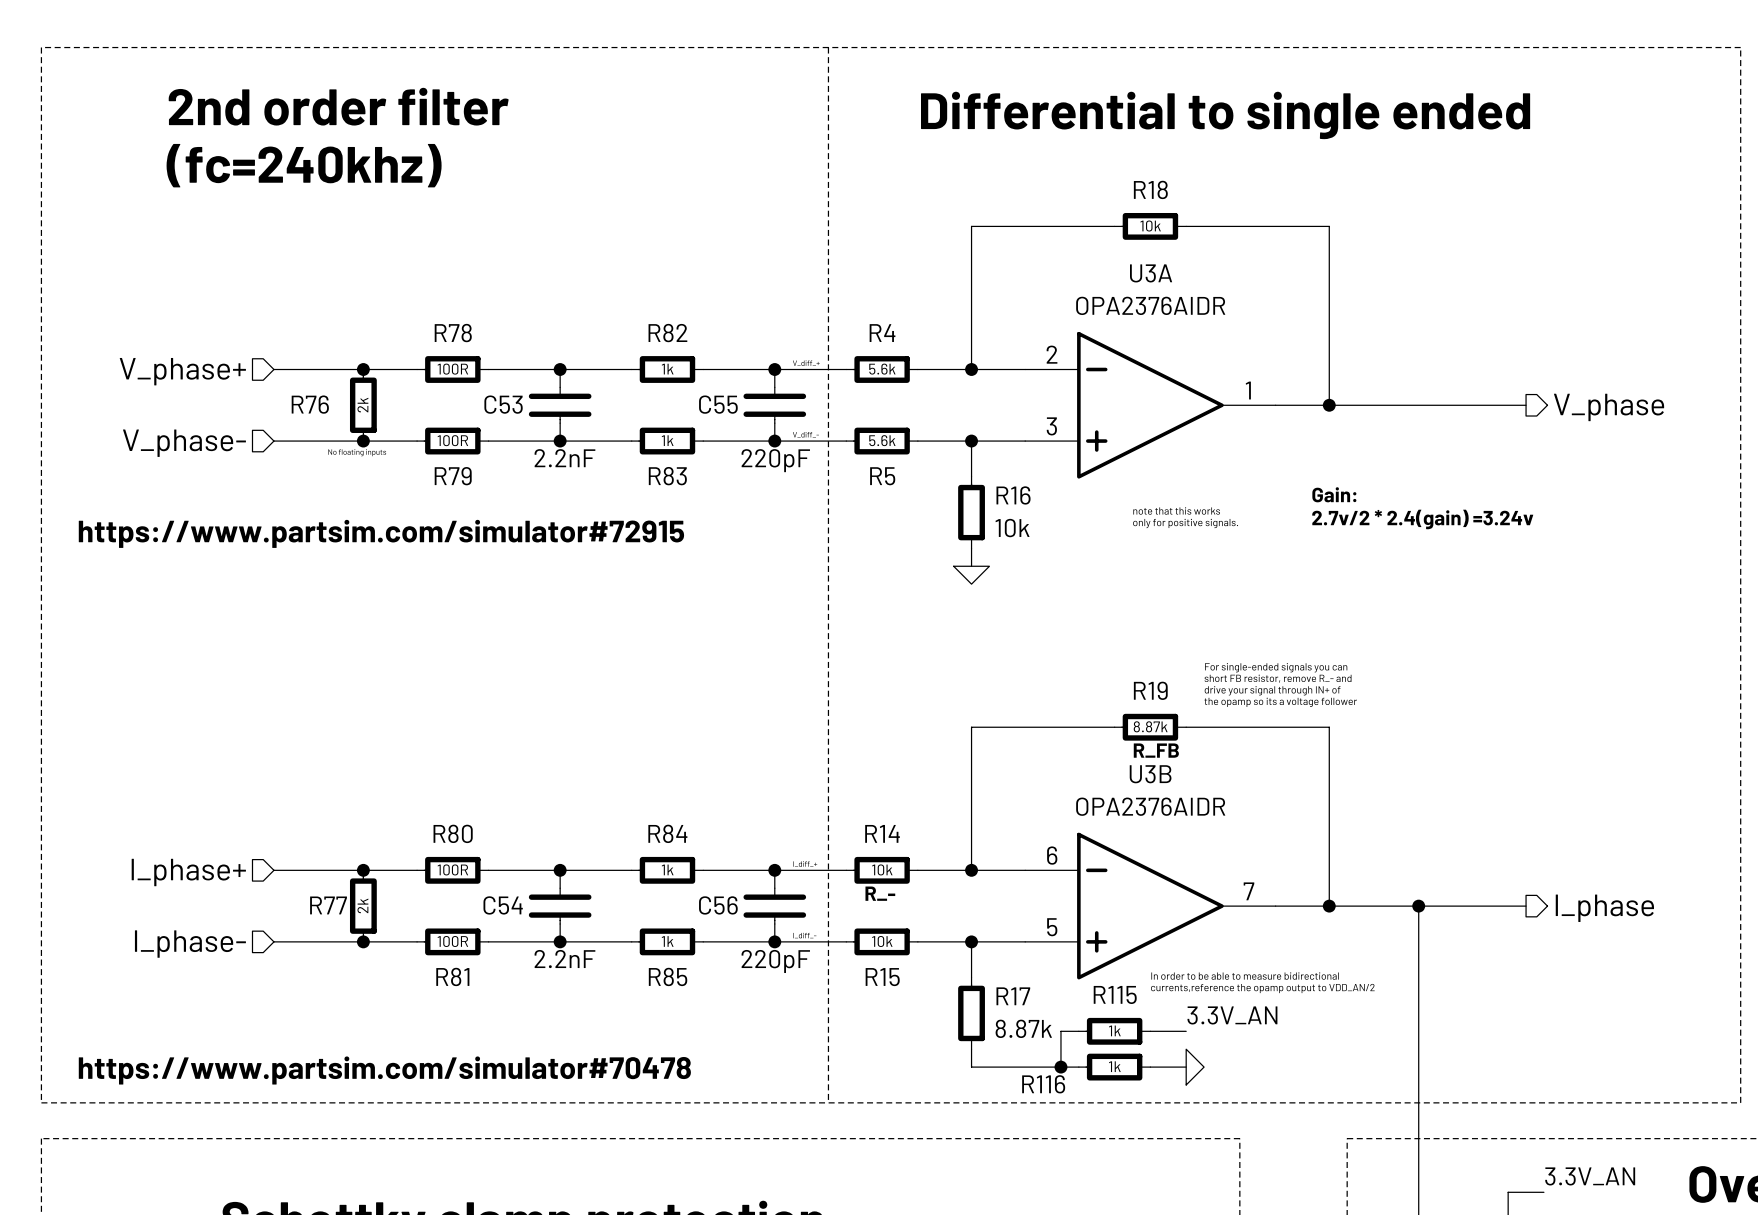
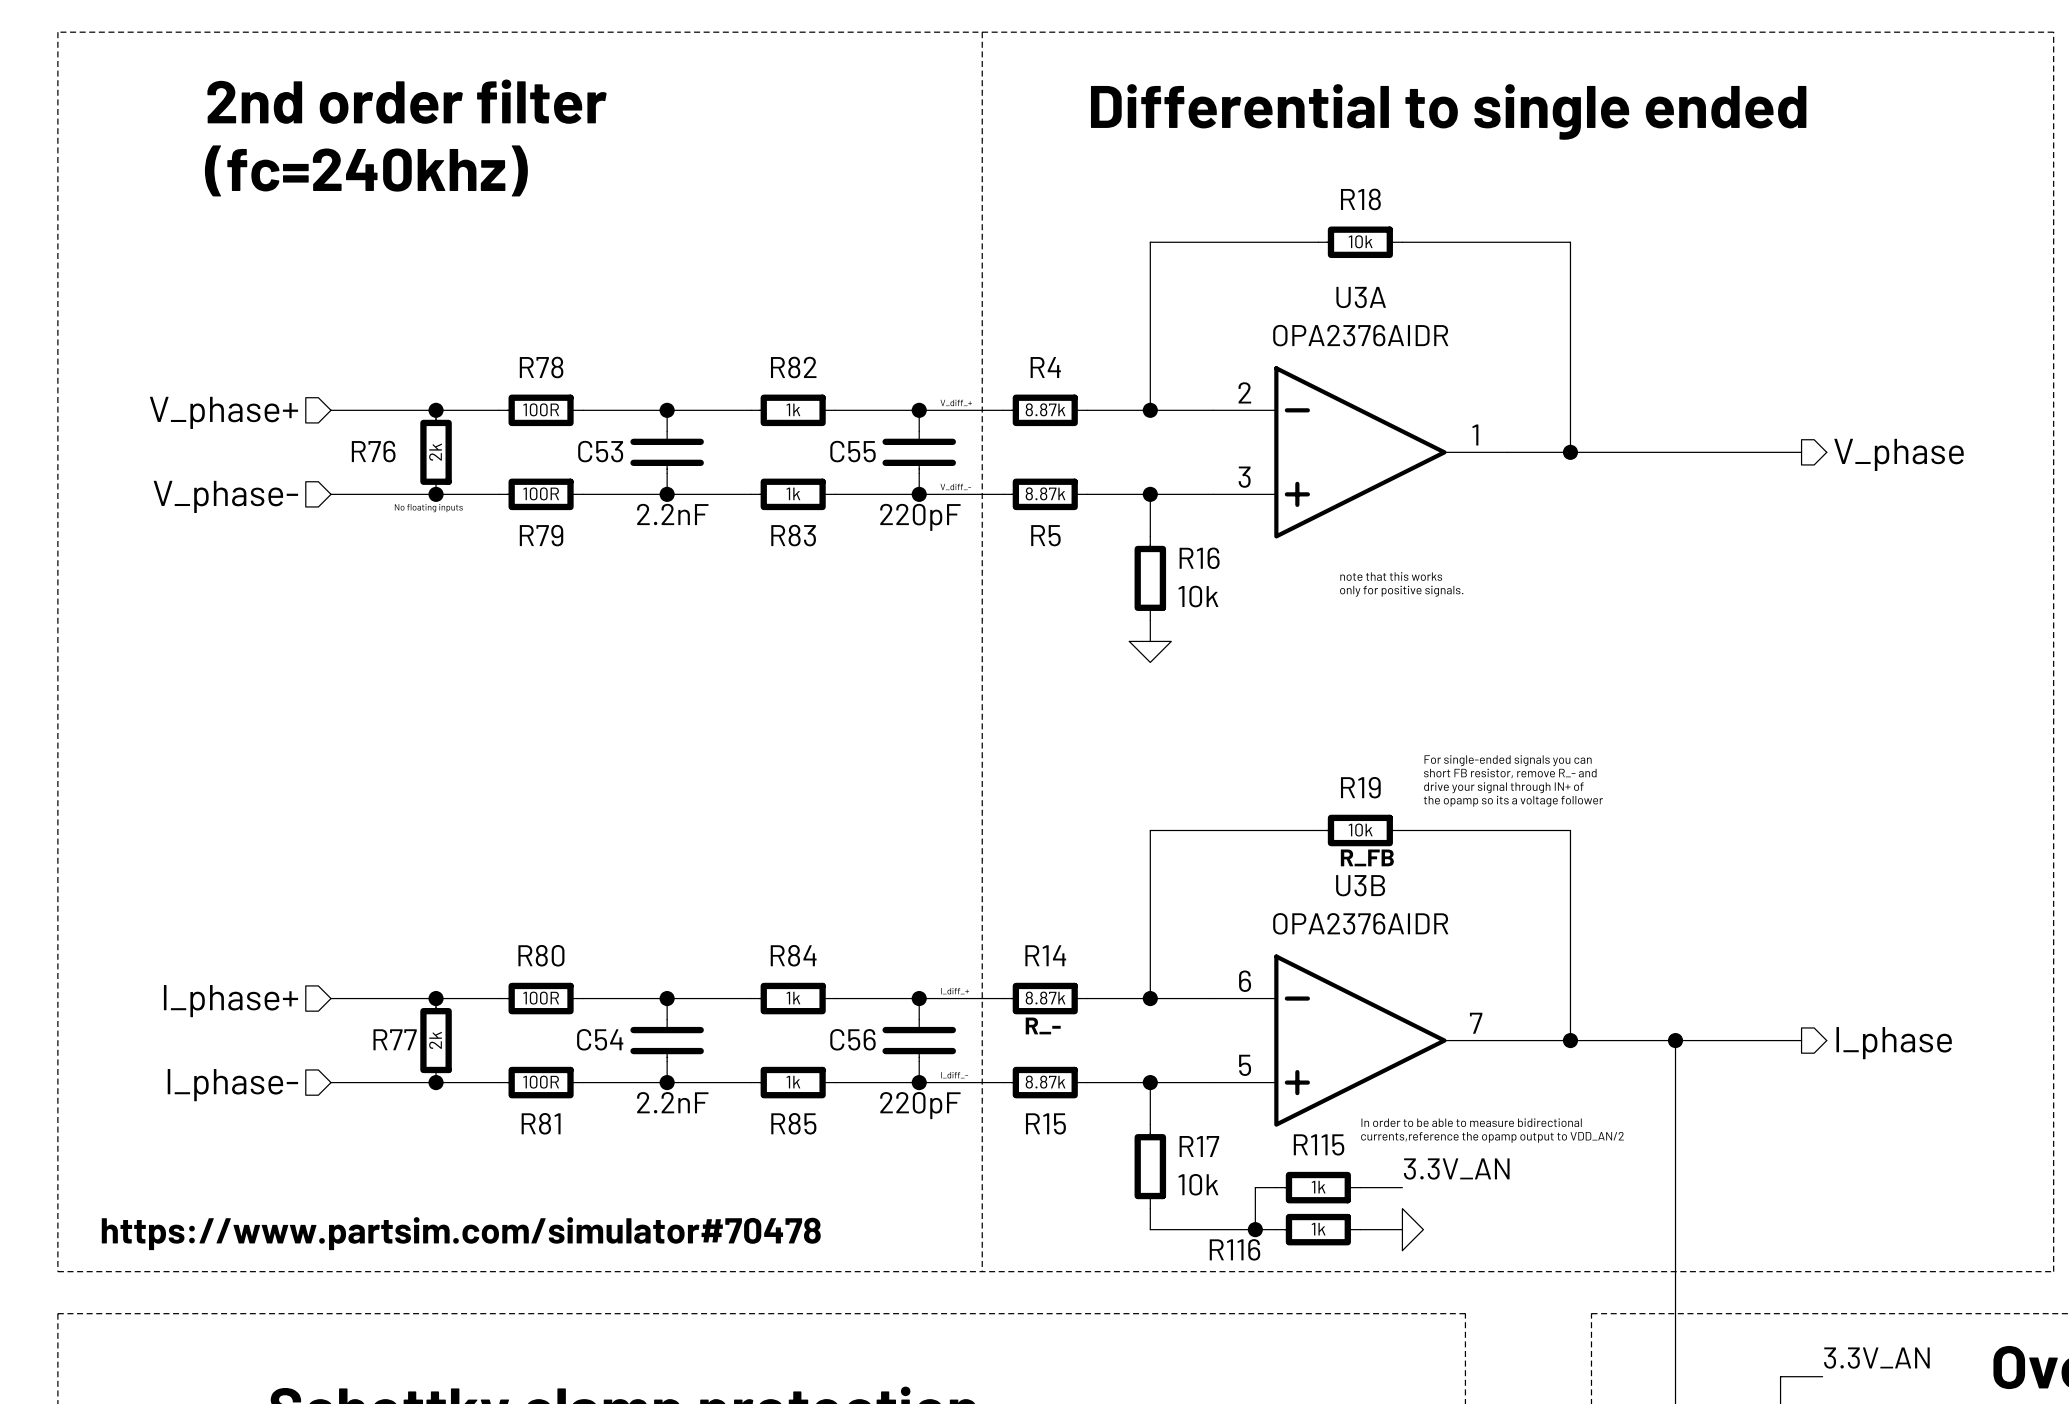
R4 value: 5.6k (882, 369) -> 8.87k (1045, 409)
R5 value: 5.6k (882, 440) -> 8.87k (1045, 493)
text: Gain: (1334, 494) -> none
text: 2.7v/2 * 2.4(gain) =3.24v (1422, 519) -> none
text: https://www.partsim.com/simulator#72915 (381, 533) -> none
R19 value: 8.87k (1150, 726) -> 10k (1360, 830)
R14 value: 10k (882, 869) -> 8.87k (1045, 998)
R15 value: 10k (882, 941) -> 8.87k (1045, 1082)
R17 value: 8.87k (1023, 1028) -> 10k (1198, 1184)

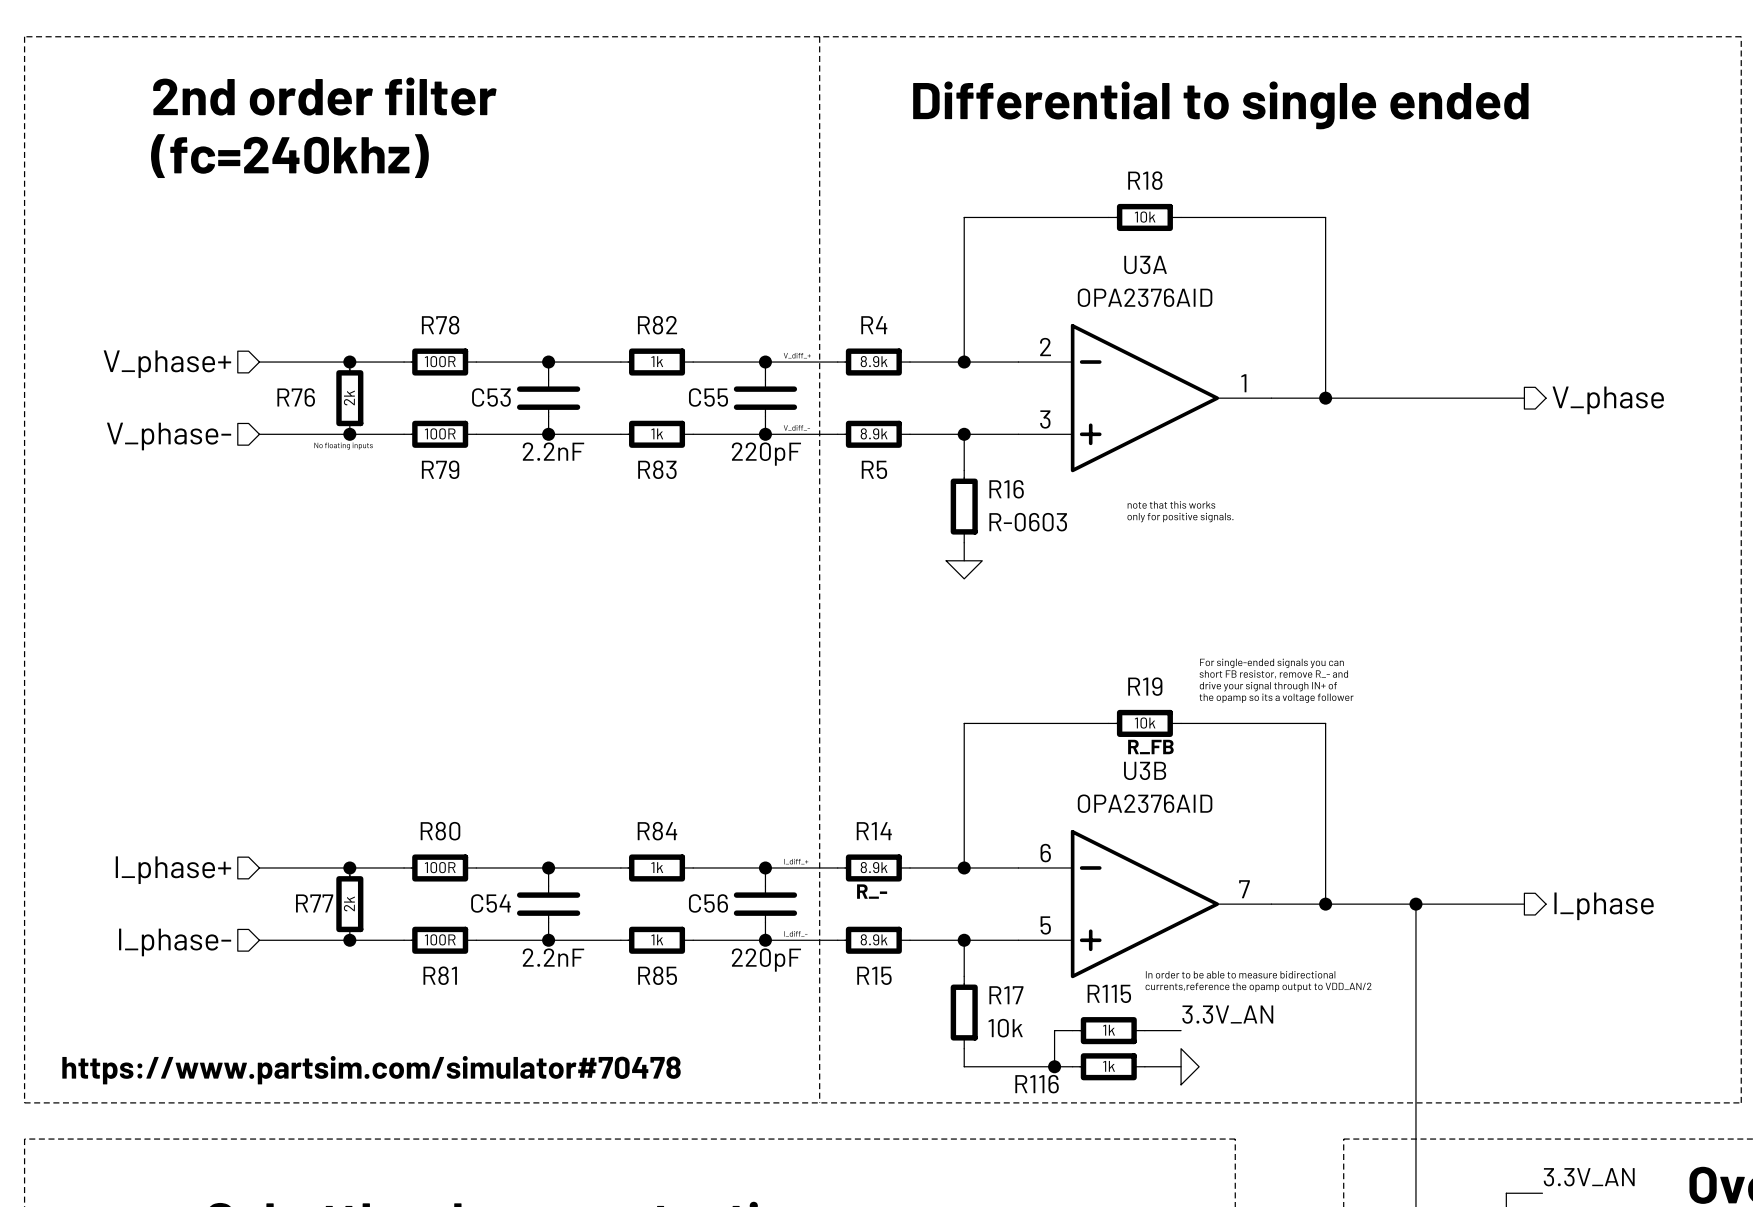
U3A value: OPA2376AIDR (1360, 335) -> OPA2376AID (1145, 297)
R4 value: 8.87k (1045, 409) -> 8.9k (874, 361)
R5 value: 8.87k (1045, 493) -> 8.9k (874, 433)
R16 value: 10k (1198, 596) -> R-0603 (1028, 522)
U3B value: OPA2376AIDR (1360, 923) -> OPA2376AID (1145, 803)
R14 value: 8.87k (1045, 998) -> 8.9k (874, 867)
R15 value: 8.87k (1045, 1082) -> 8.9k (874, 939)

